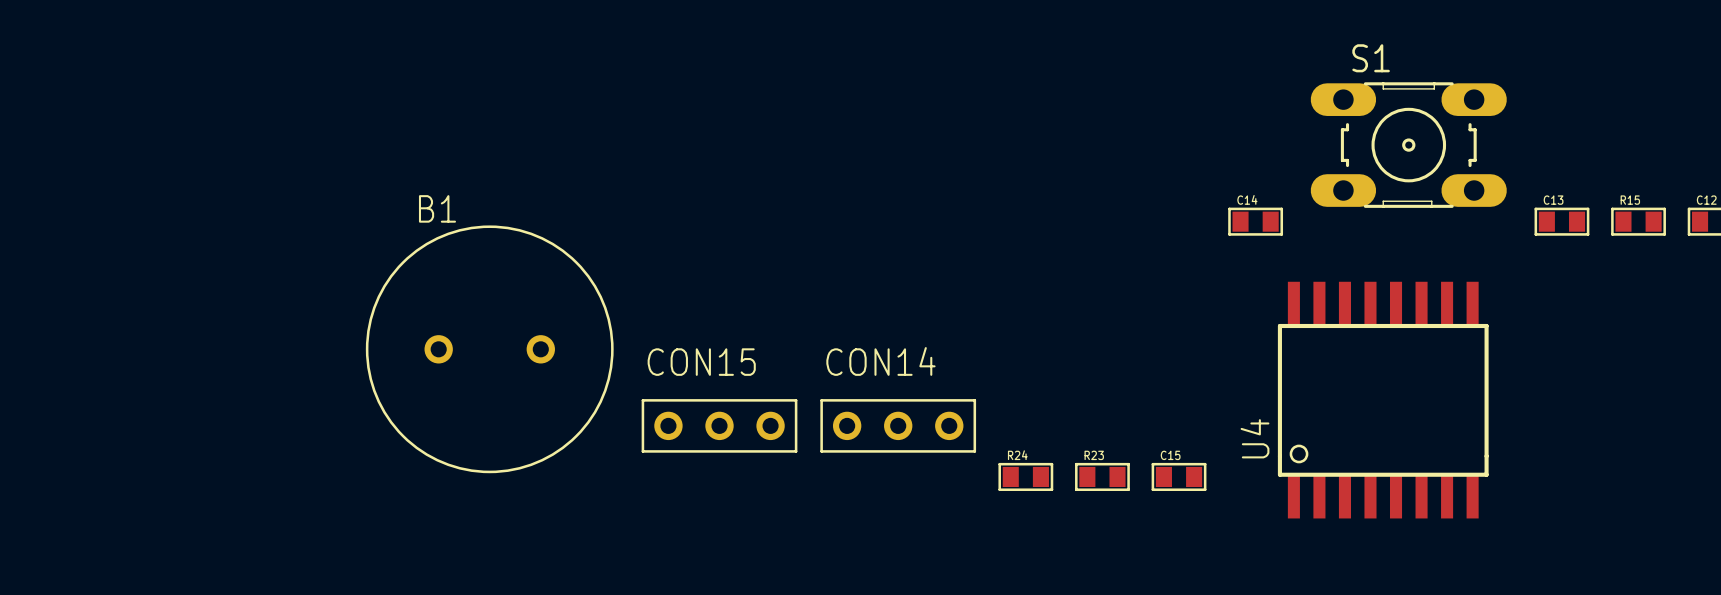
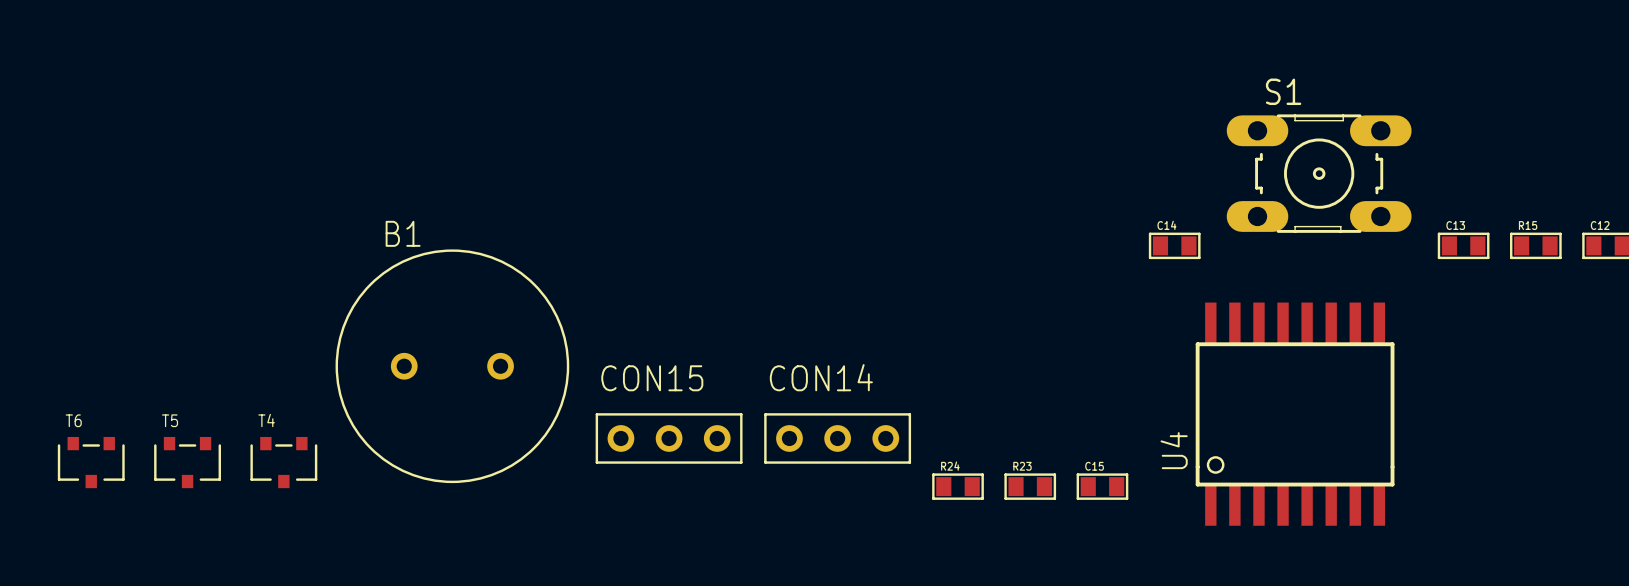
T6: none -> (91, 462)
T5: none -> (187, 462)
T4: none -> (283, 462)

